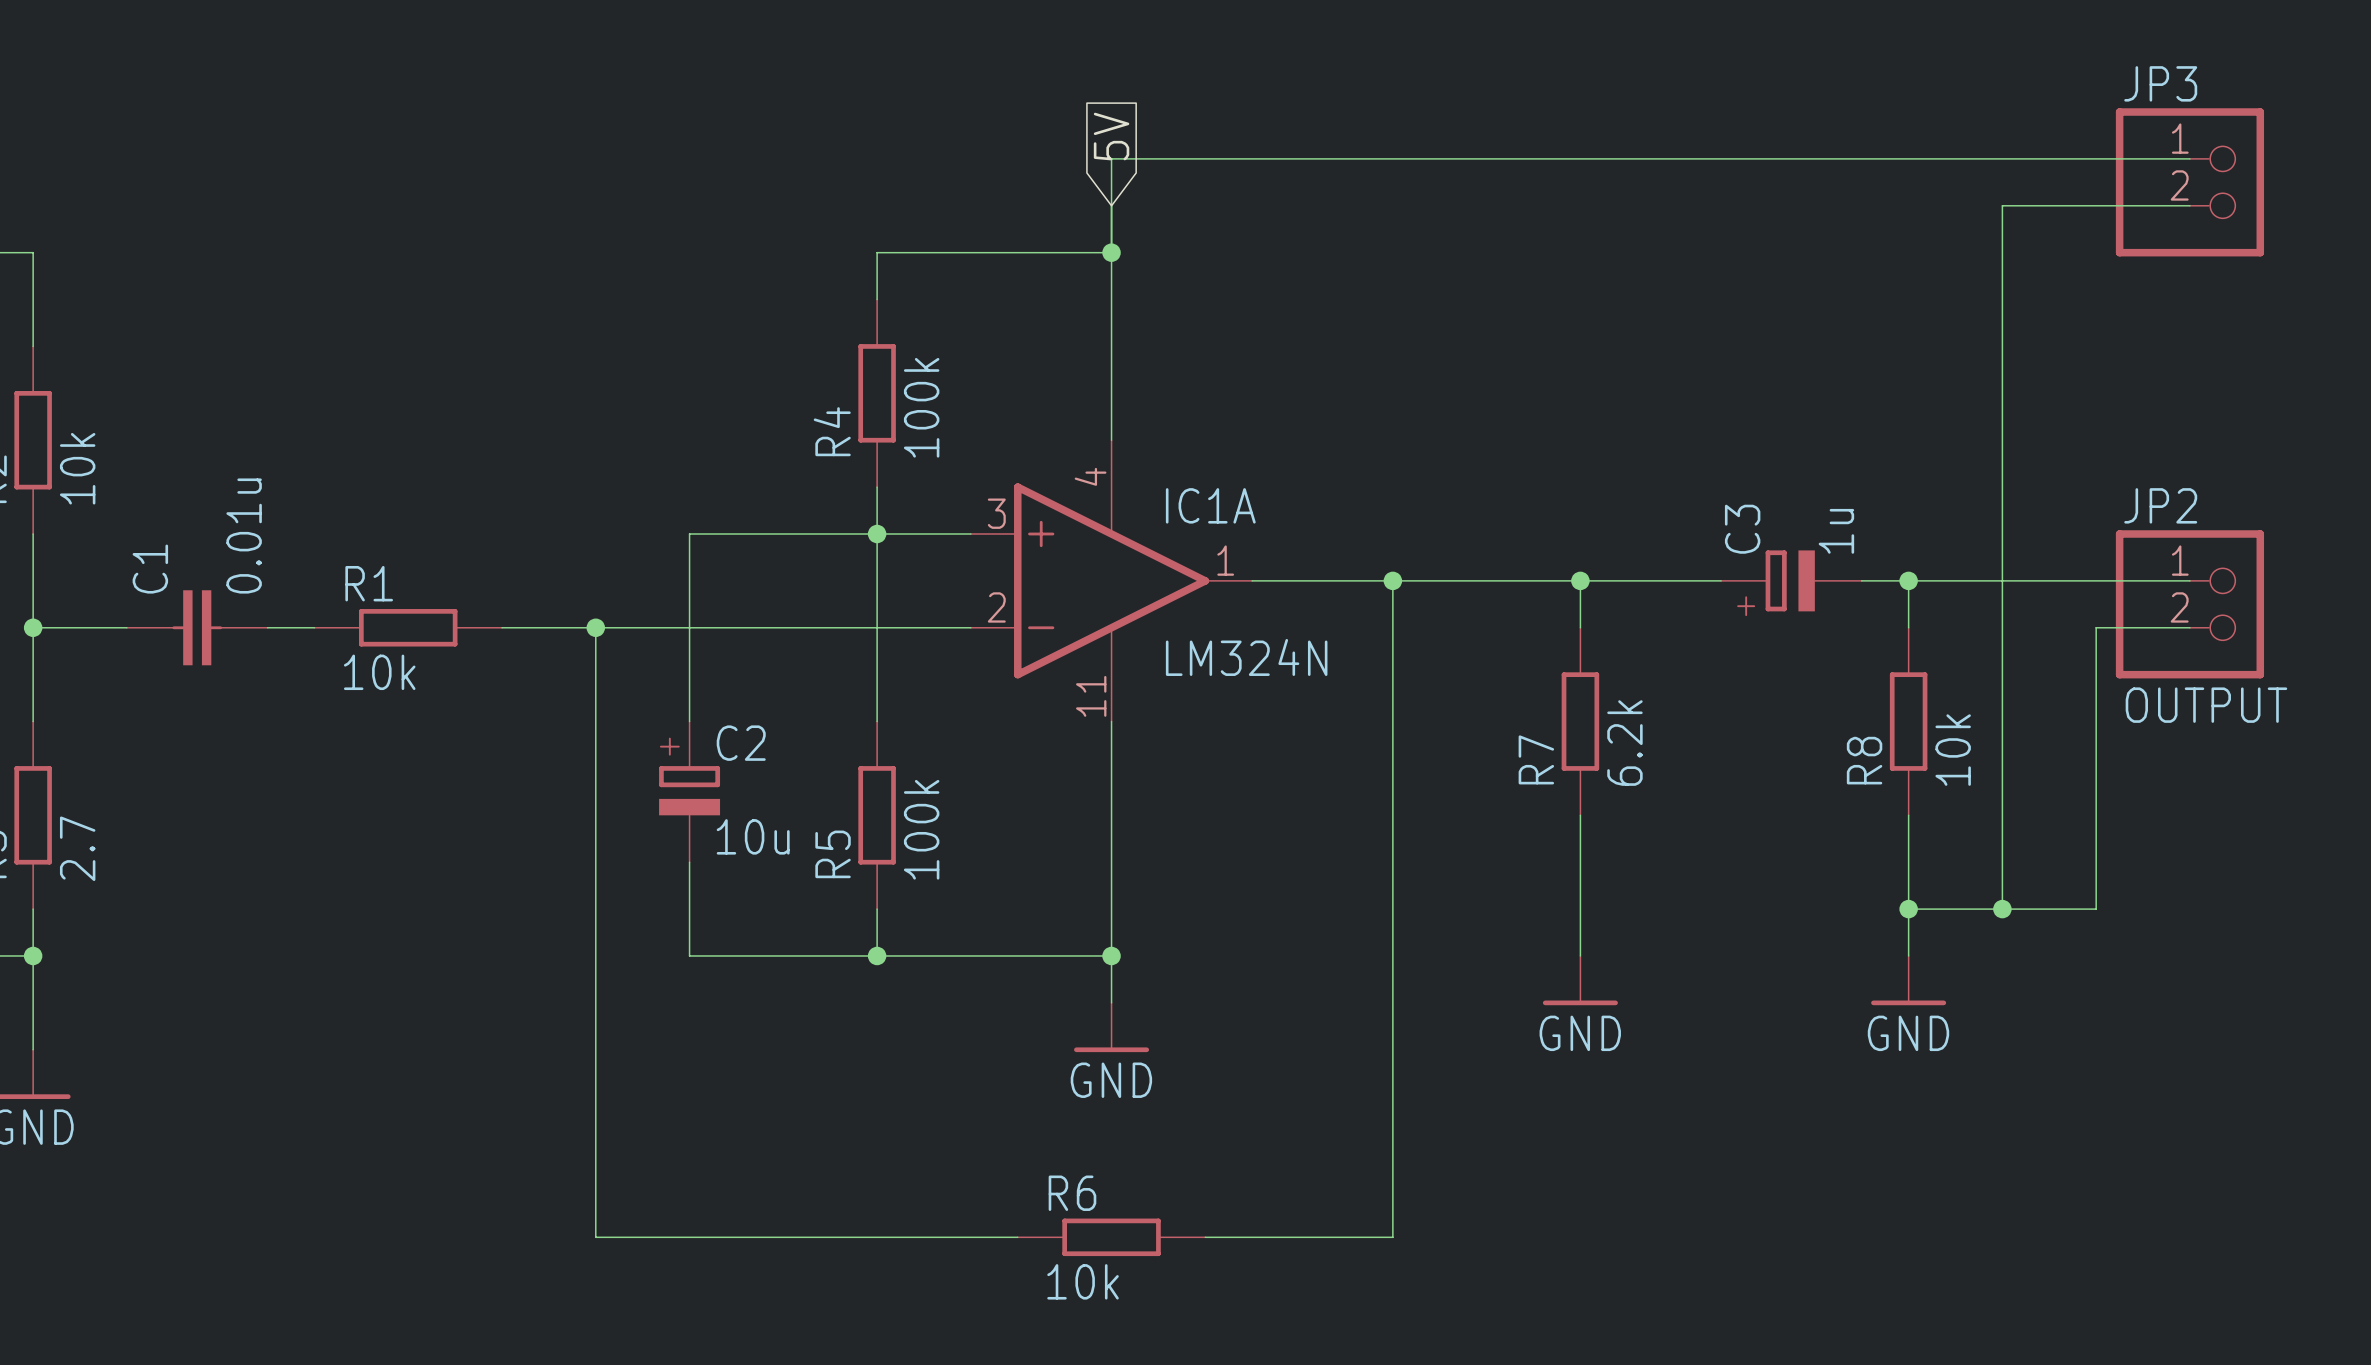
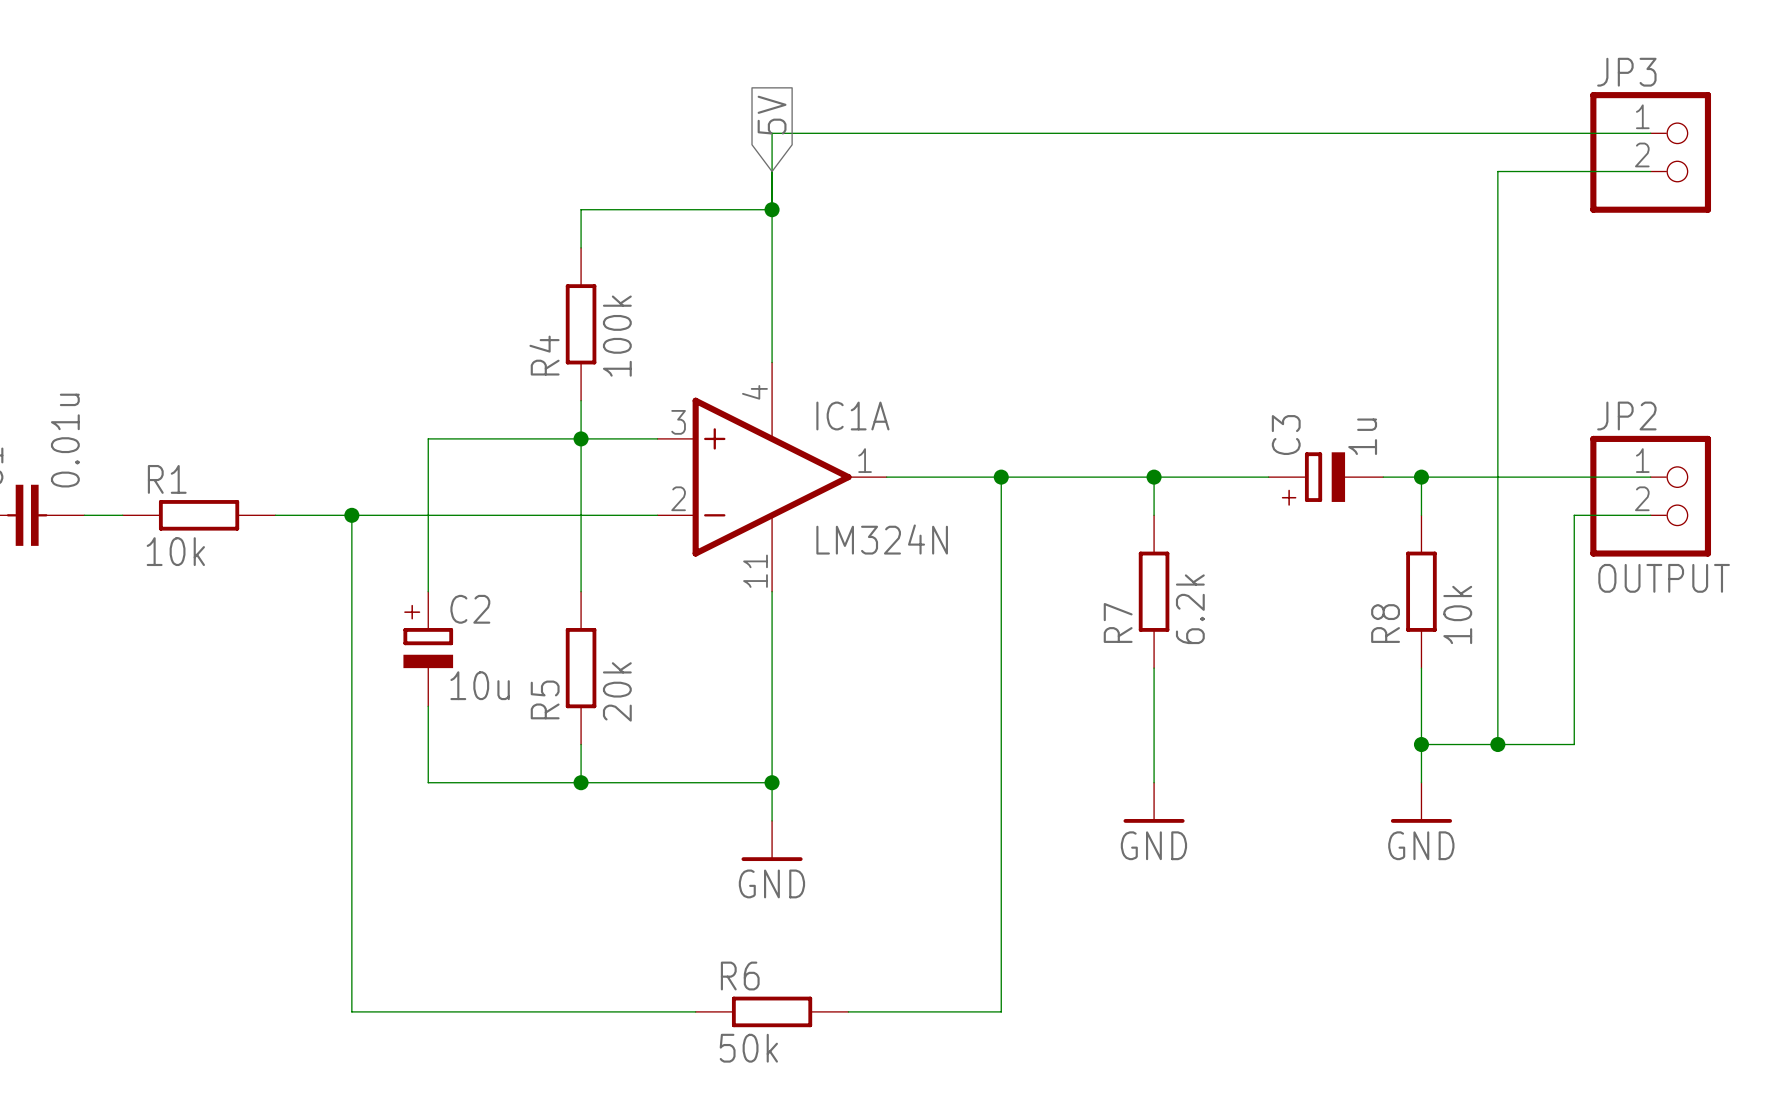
R5 value: 100k (921, 829) -> 20k (617, 691)
R6 value: 10k (1083, 1281) -> 50k (748, 1048)

